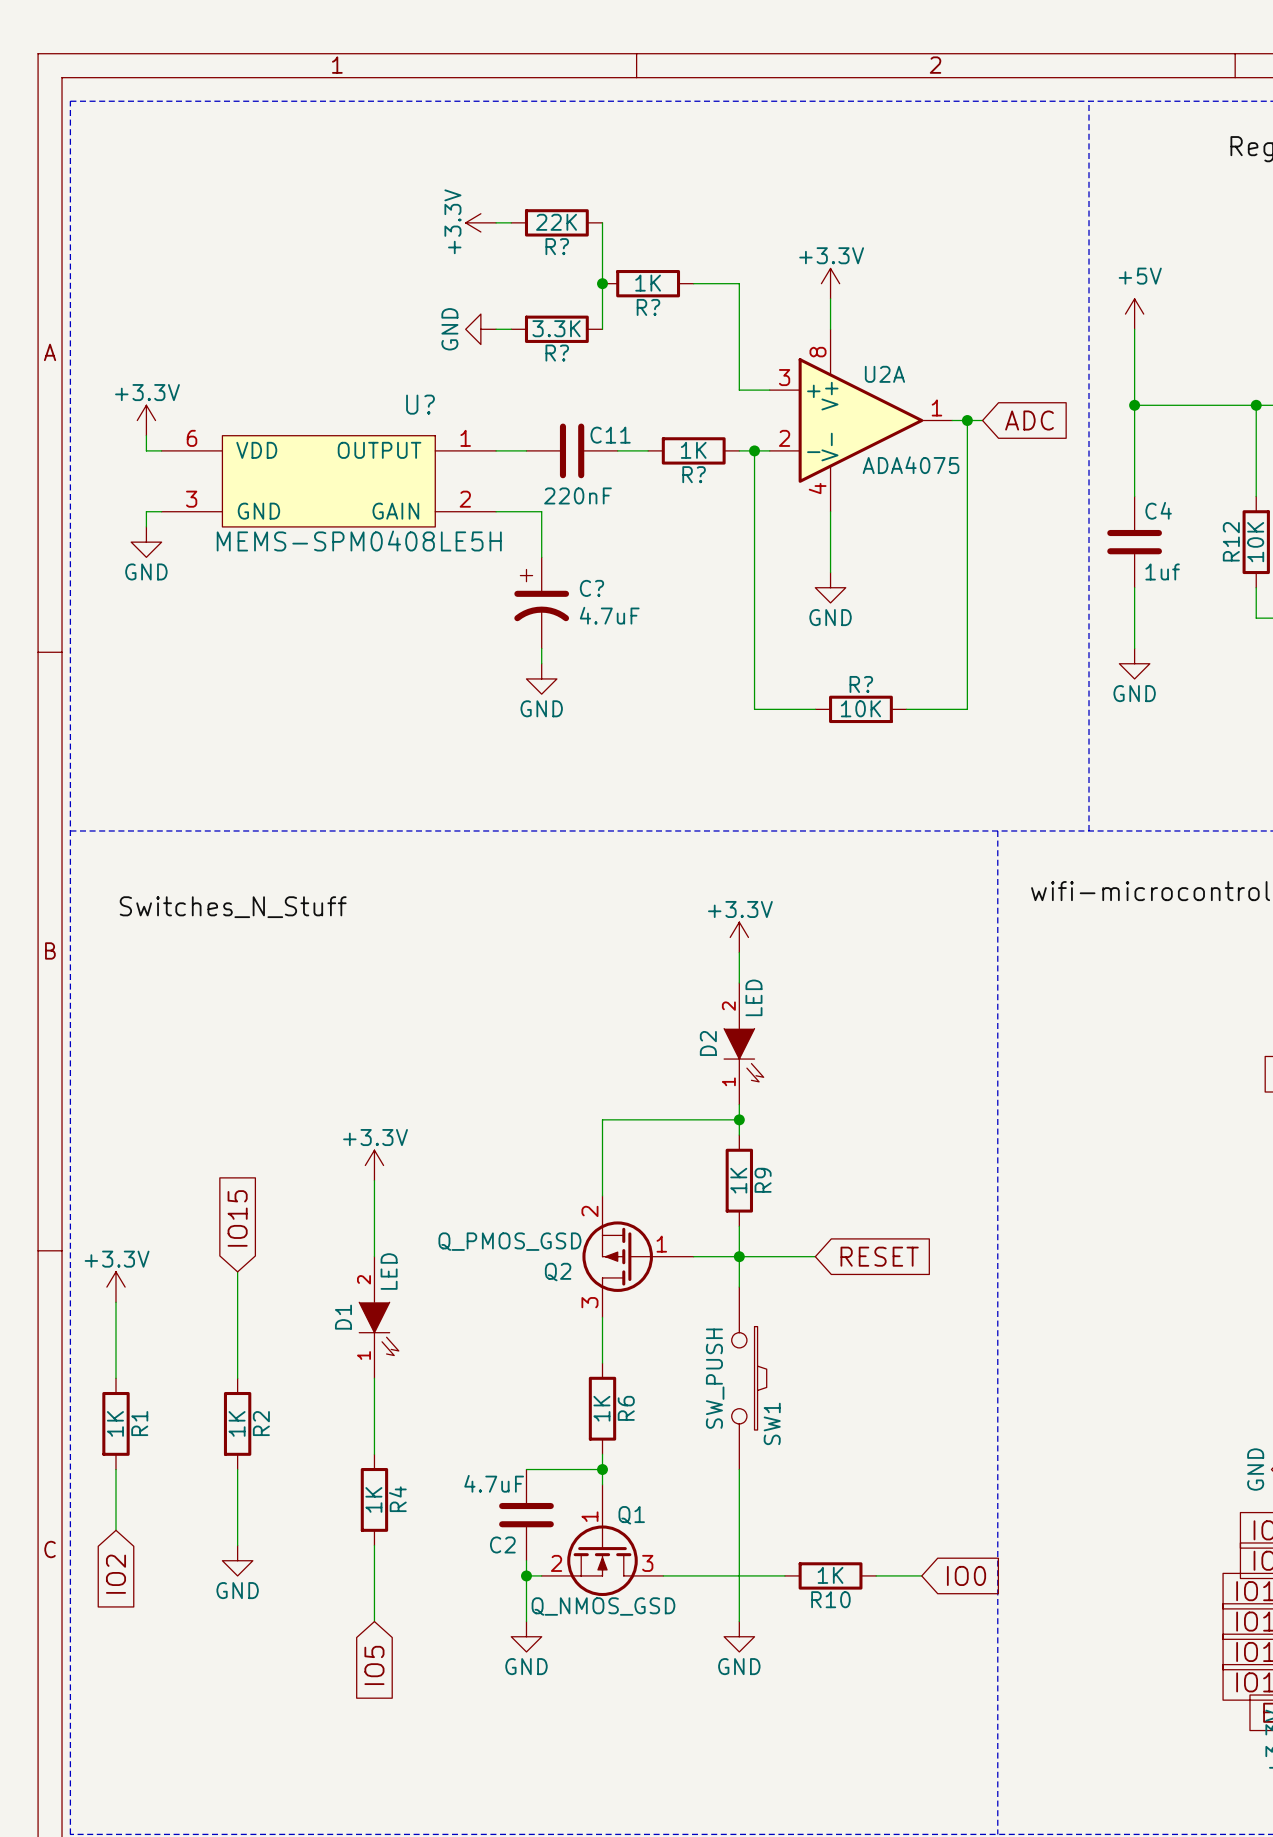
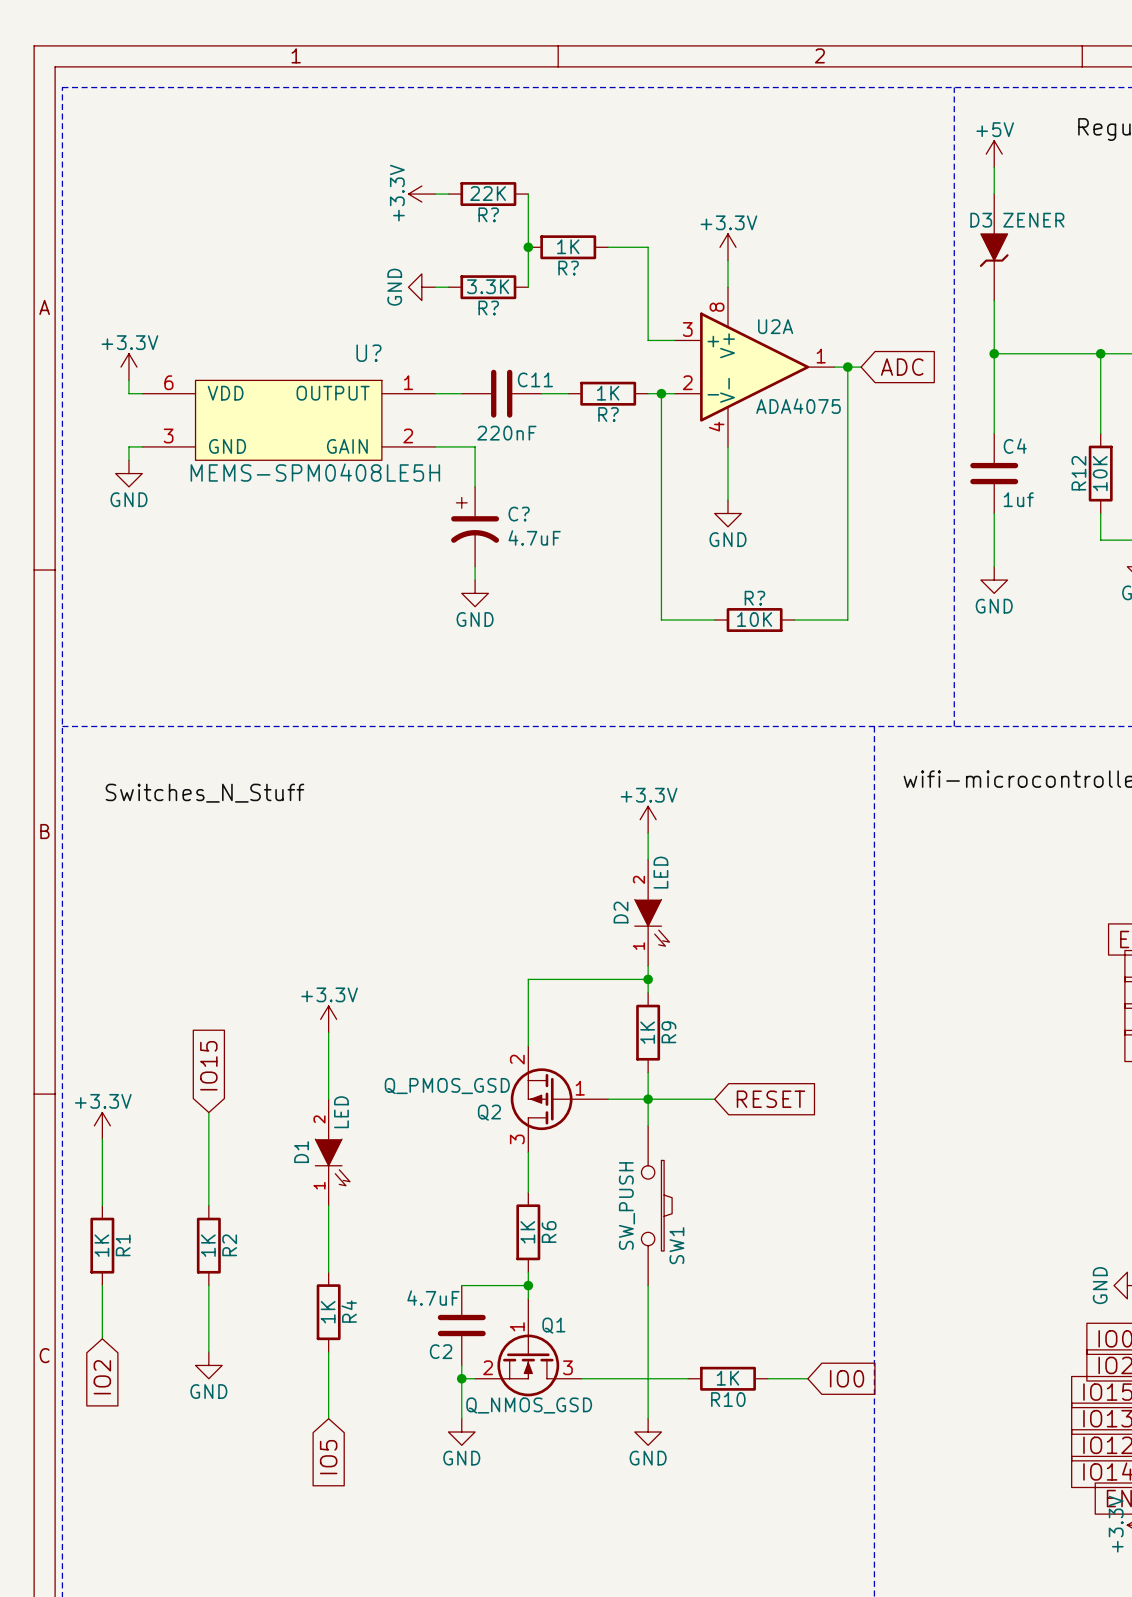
wire: none -> (994, 167) (994, 194)
power symbol text position: +5V (1140, 276) -> +5V (995, 129)
D3: none -> ZENER (994, 247)
power symbol position: +5V (1134, 314) -> +5V (994, 154)

